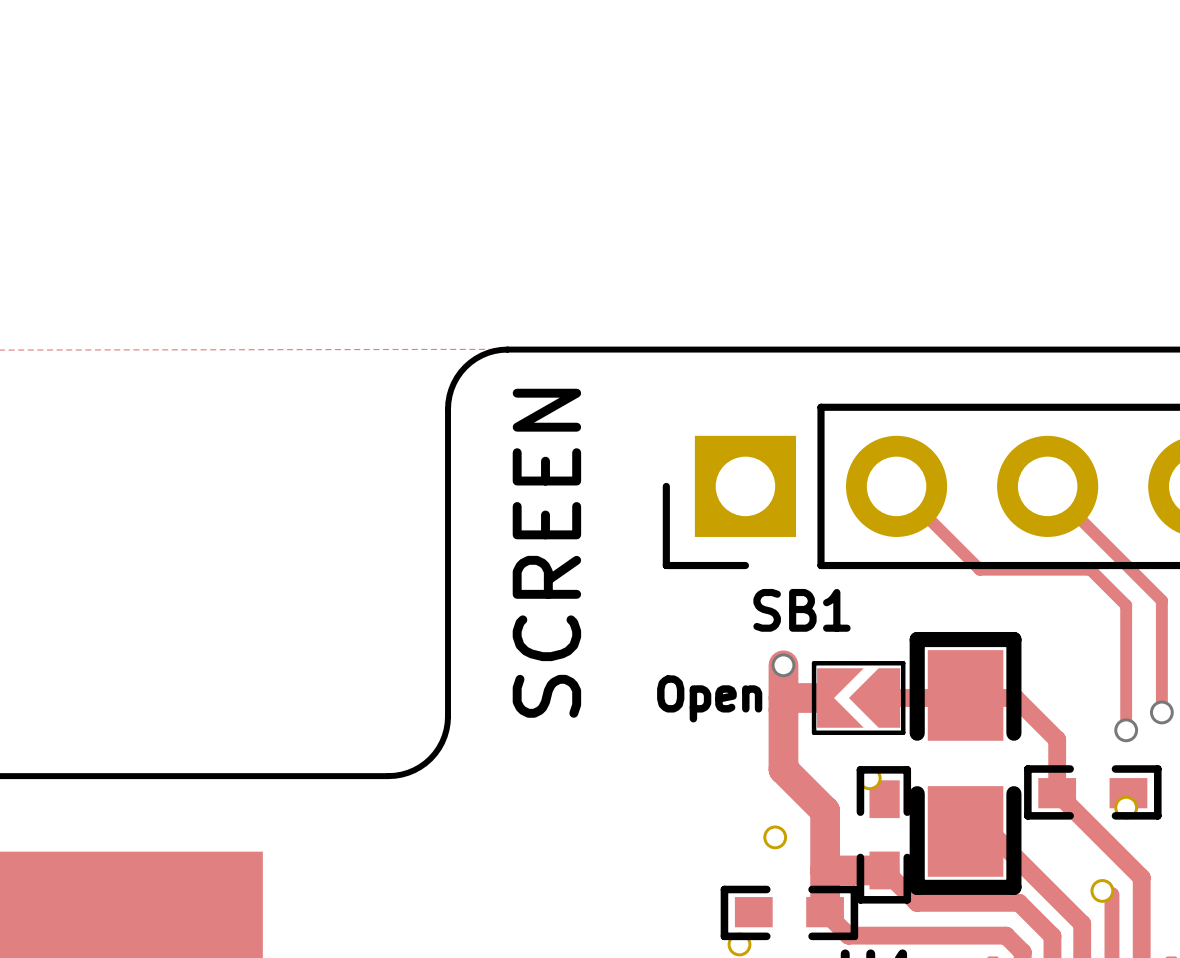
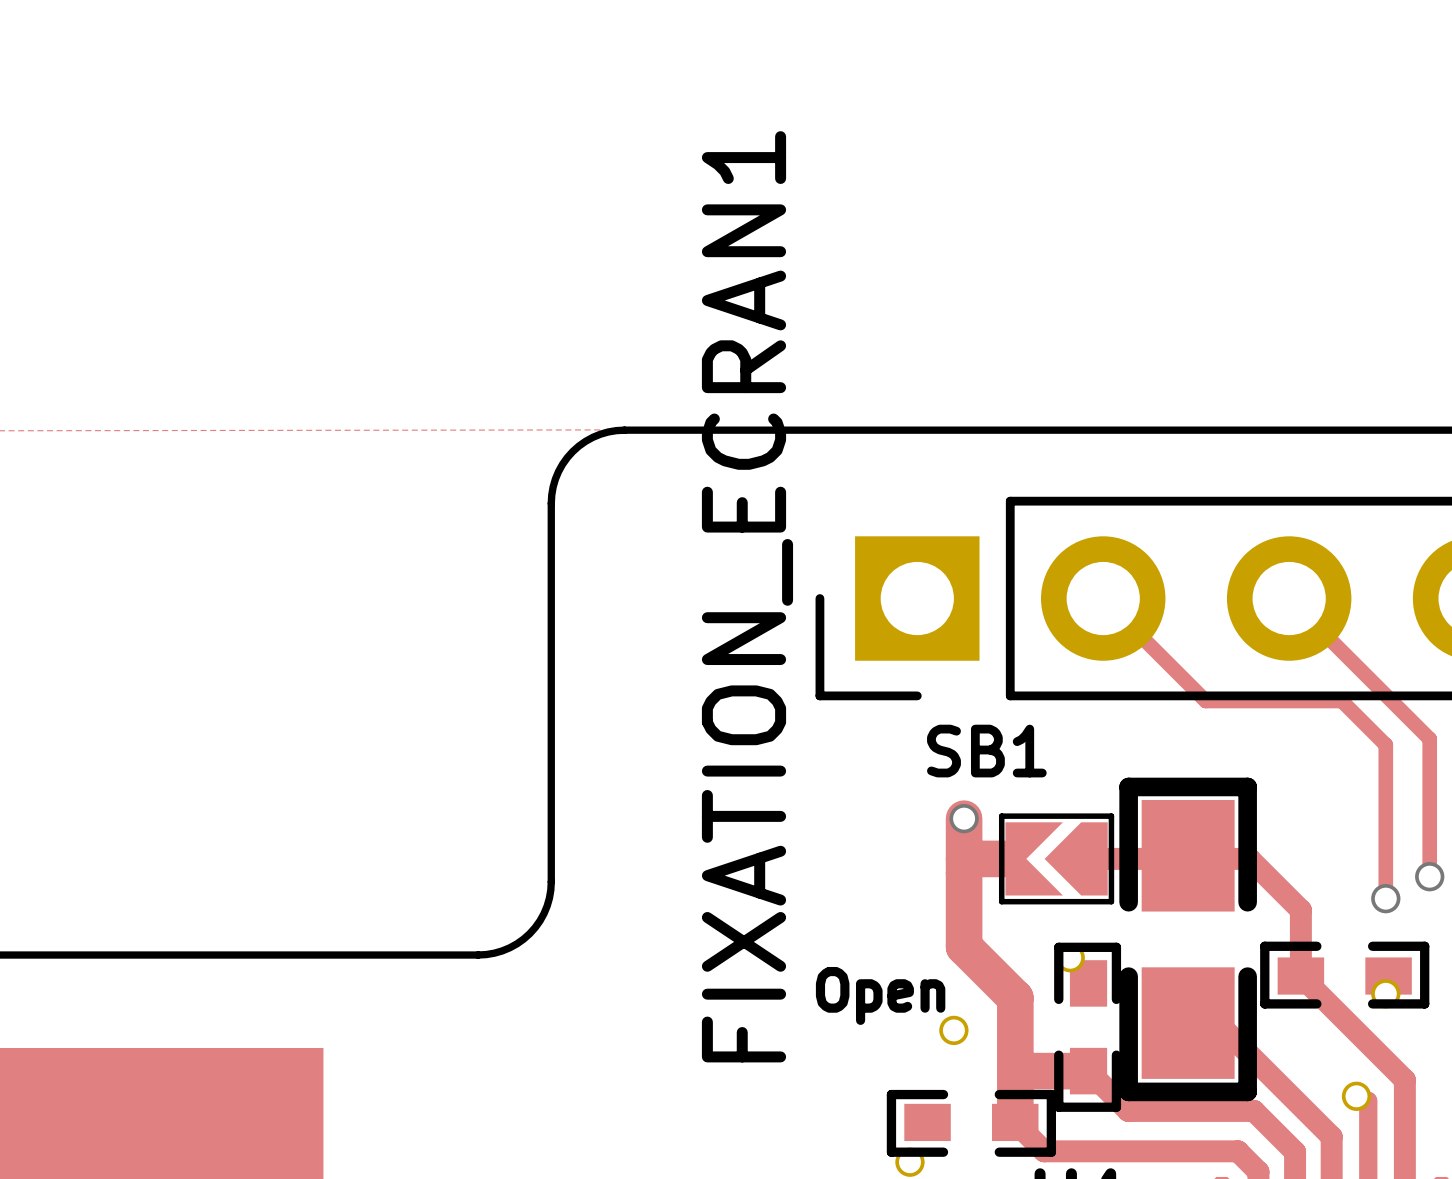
SCREEN name: SCREEN (546, 553) -> FIXATION_ECRAN1 (747, 596)
SB1 value position: Open (709, 698) -> Open (880, 995)

